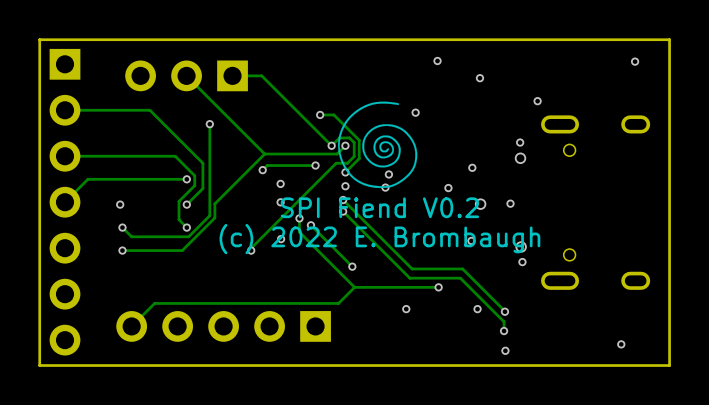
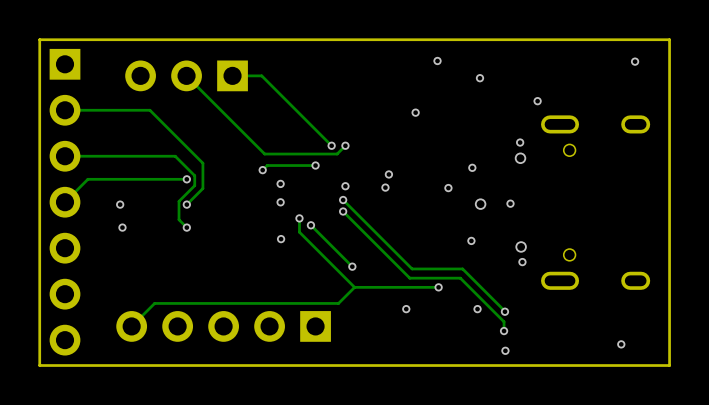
drawing: [337, 101, 418, 189] -> none
track: (320, 114) (333, 114) (359, 140) (359, 158) (345, 172) -> none
via: (320, 114) -> none
track: (209, 124) (209, 215) (188, 236) (131, 236) (122, 227) -> none
via: (209, 124) -> none
track: (331, 145) (339, 137) (349, 137) (354, 142) (354, 156) (347, 163) (336, 163) (251, 248) (251, 250) -> none
track: (264, 154) (214, 203) (214, 217) (182, 250) (122, 250) -> none
via: (345, 172) -> none
text: SPI Fiend V0.2 (379, 207) -> none
text: (c) 2022 E. Brombaugh (379, 239) -> none
via: (122, 250) -> none
via: (251, 250) -> none

